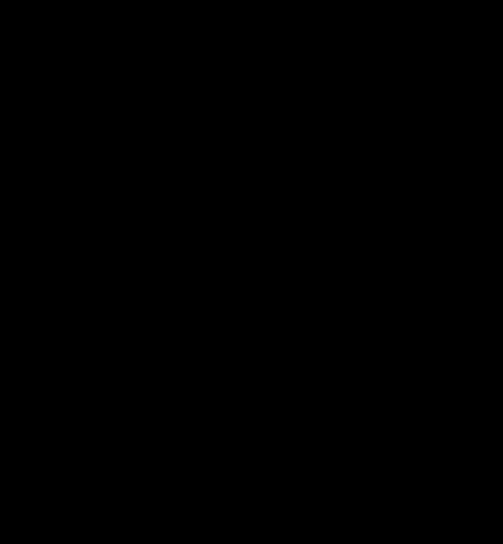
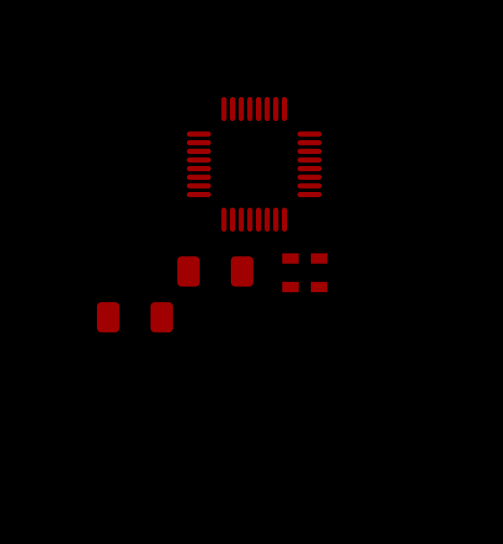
part: none -> (254, 164)
part: none -> (215, 271)
part: none -> (304, 272)
part: none -> (134, 317)

